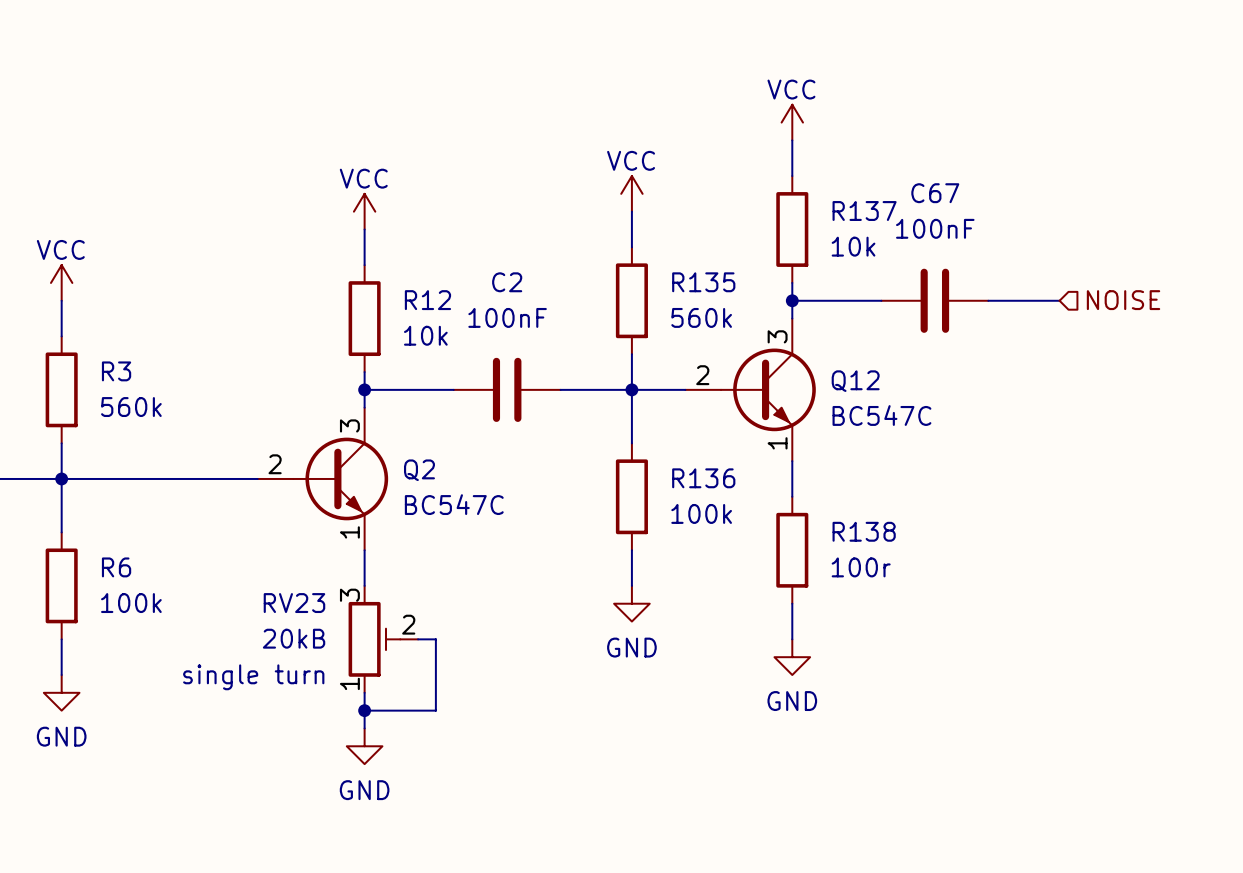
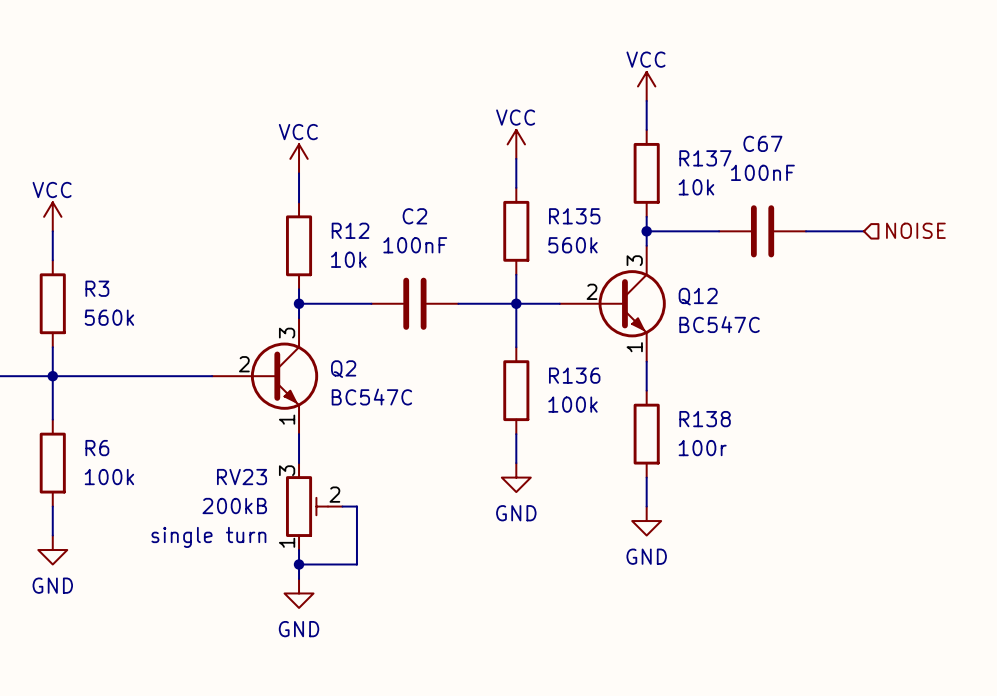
Q12 symbol: [685, 318, 816, 462] -> [559, 245, 666, 362]
Q2 symbol: [257, 407, 389, 551] -> [212, 318, 319, 435]
RV23 value: 20kB (294, 638) -> 200kB (234, 506)

